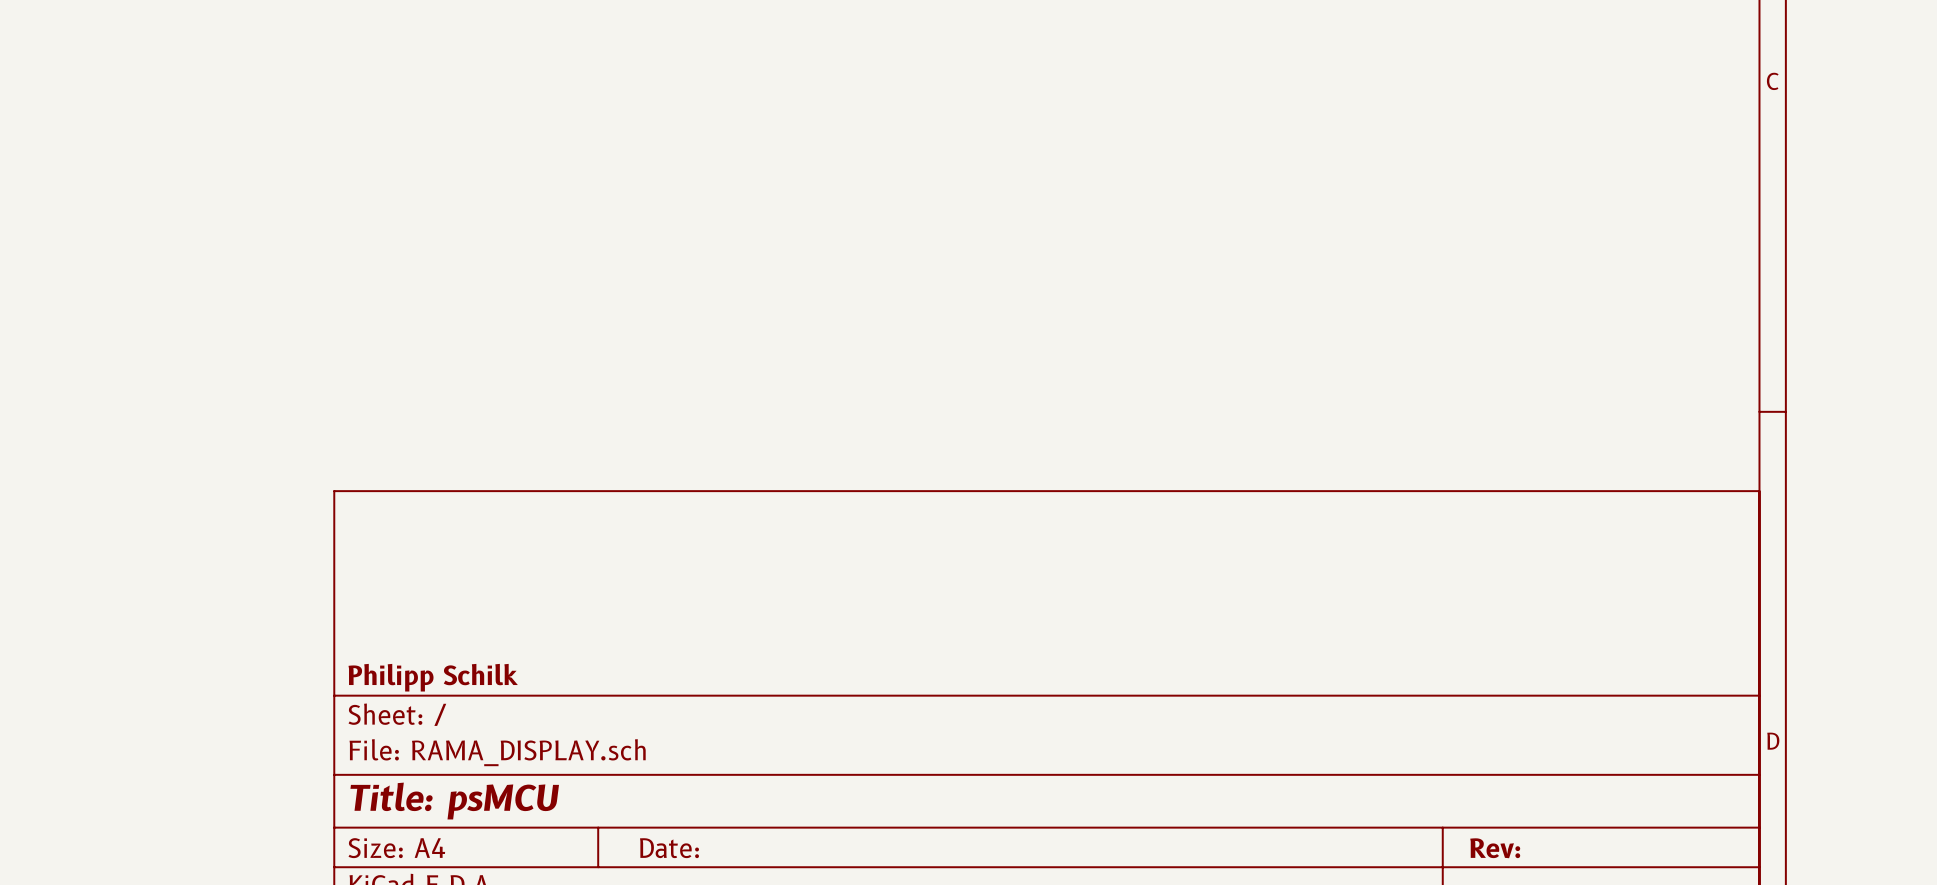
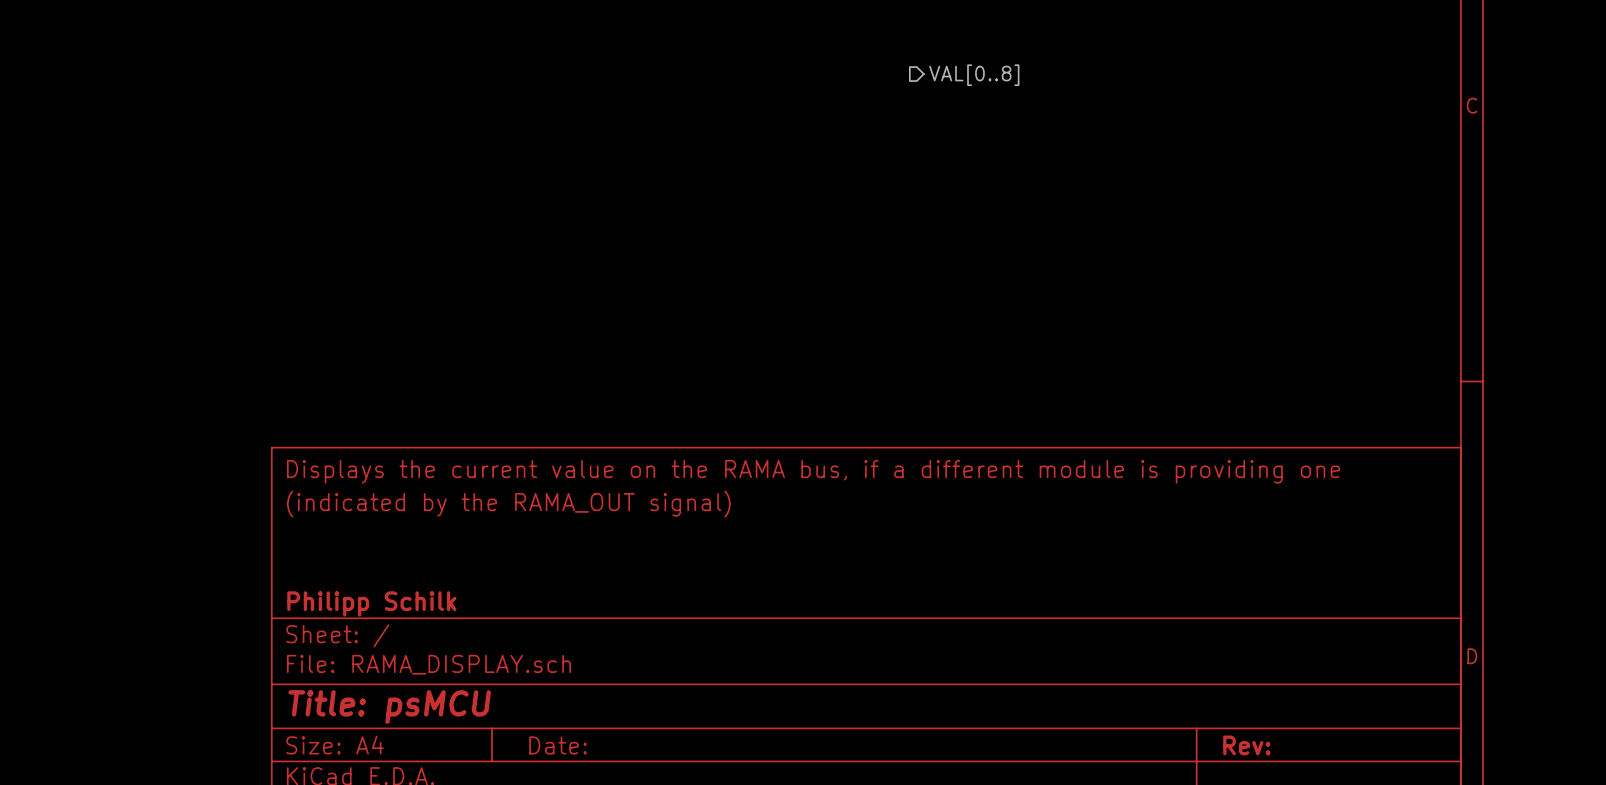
sheet pin: none -> VAL[0..8] (974, 75)
title block: none -> Displays the current value on the RAMA bus, if a different module is providing one (813, 471)
title block: none -> (indicated by the RAMA_OUT signal) (508, 504)

